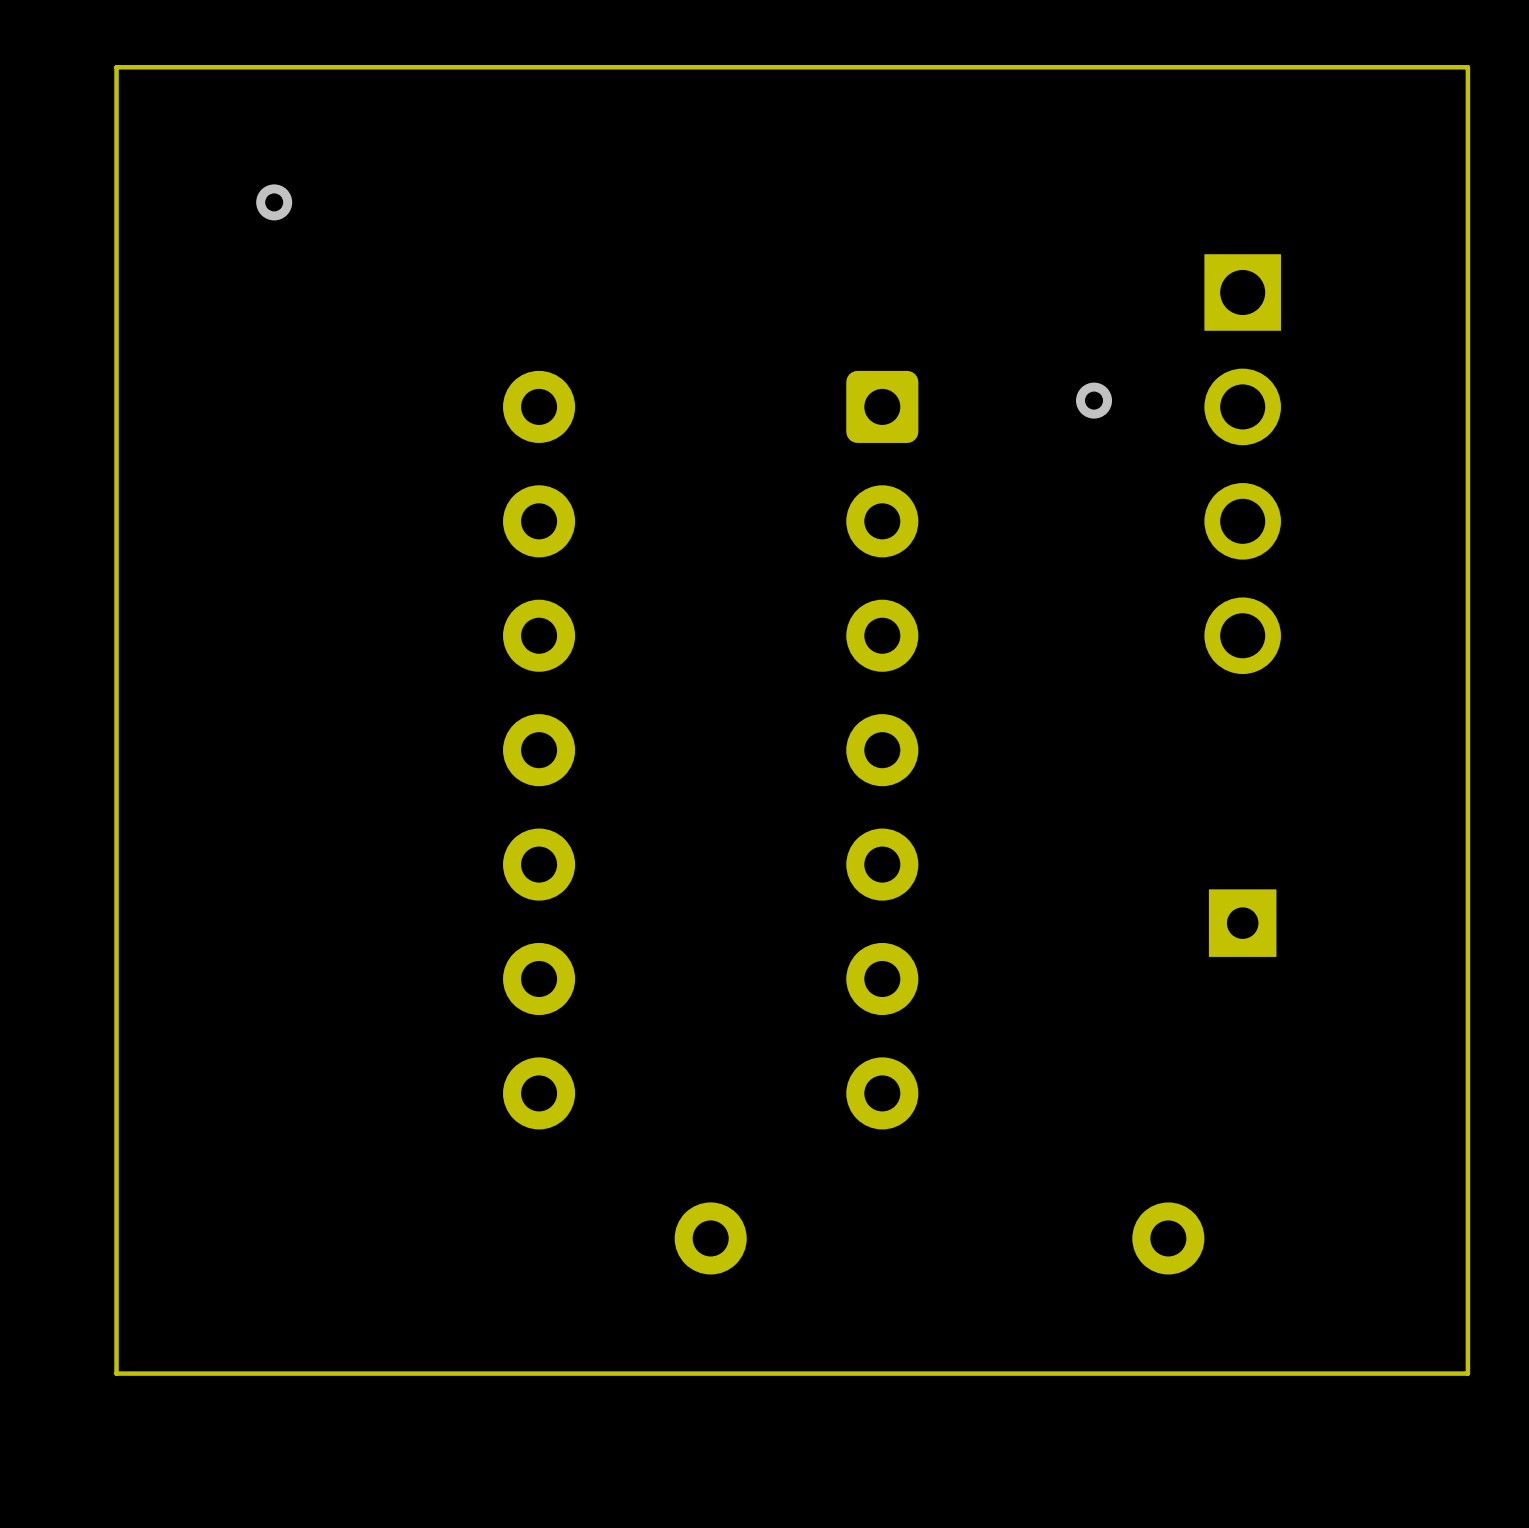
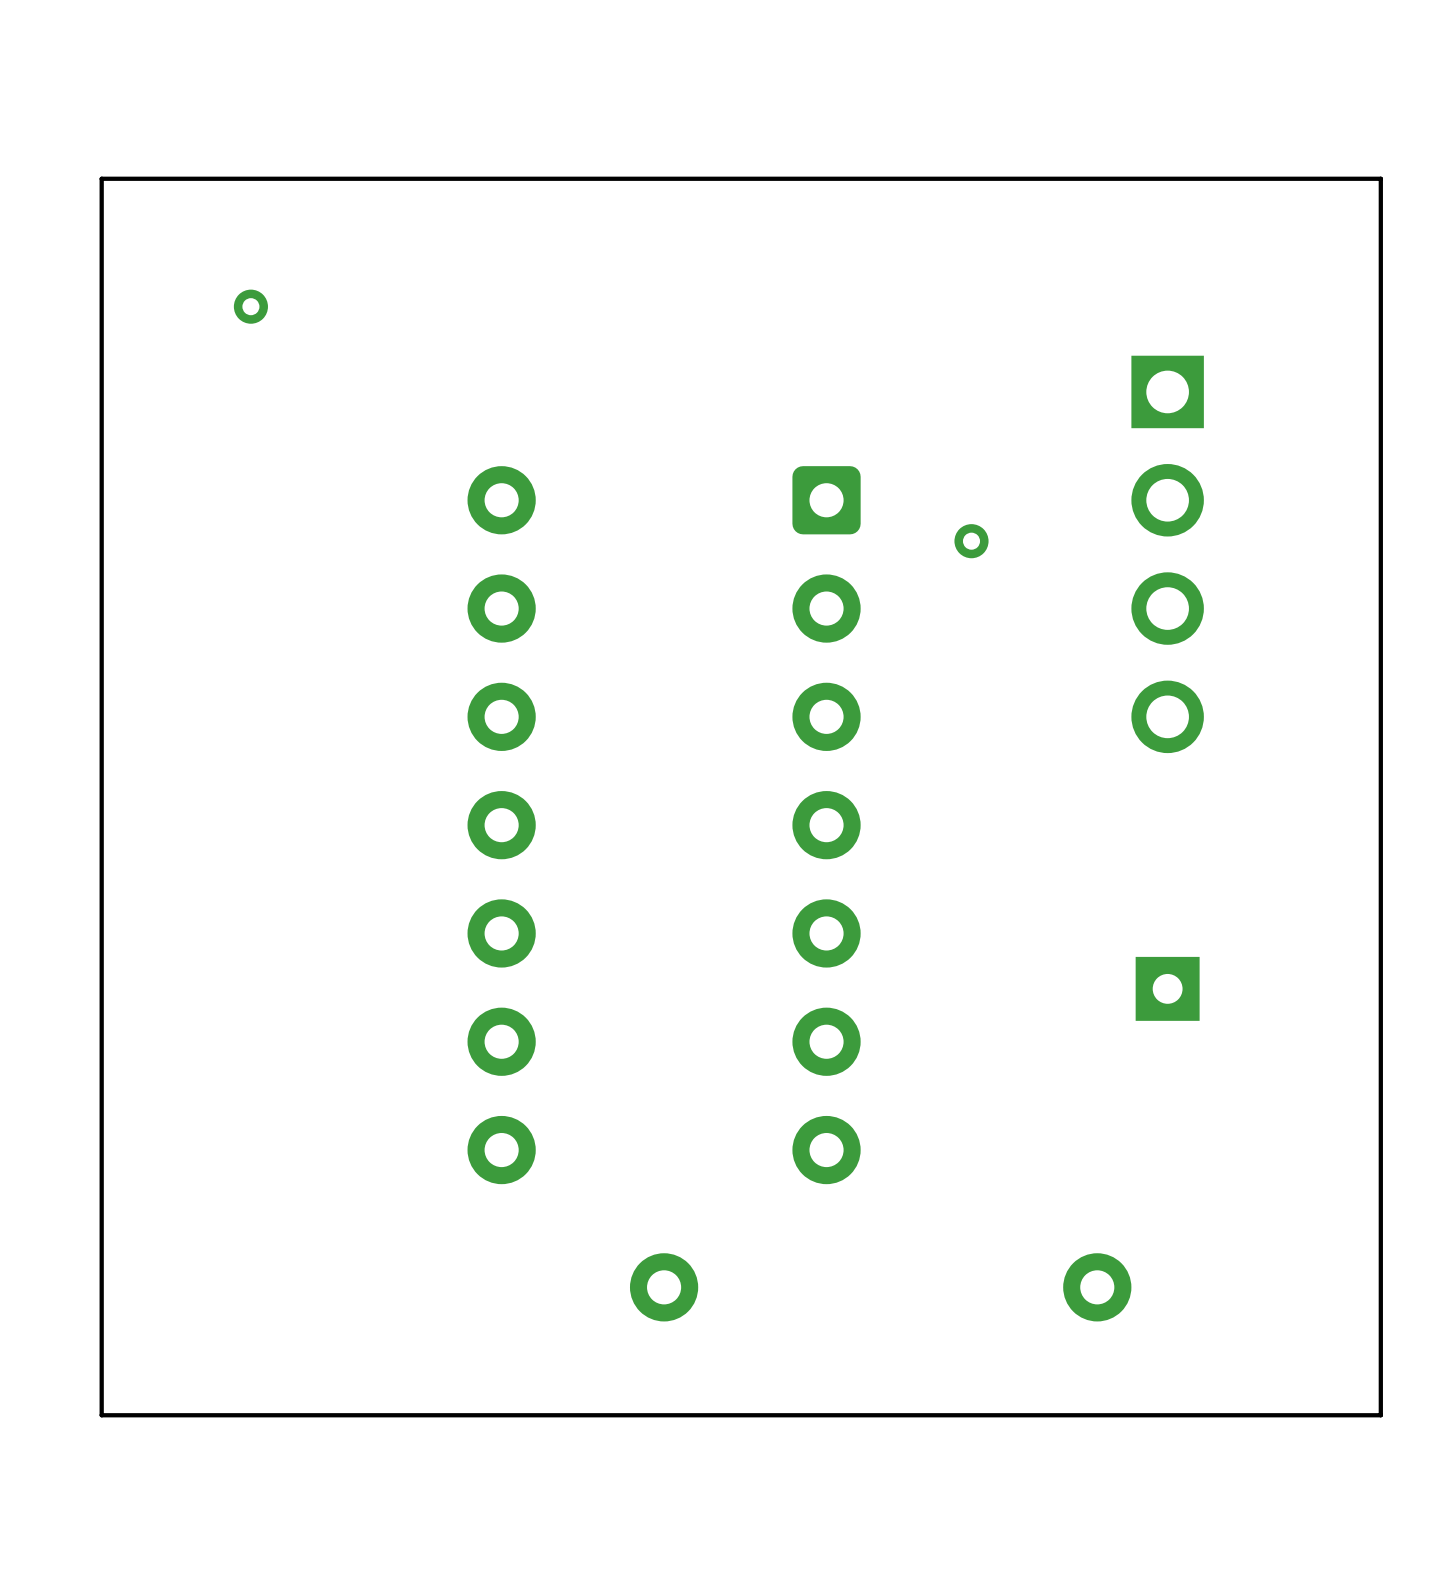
via position: (1094, 400) -> (971, 541)

